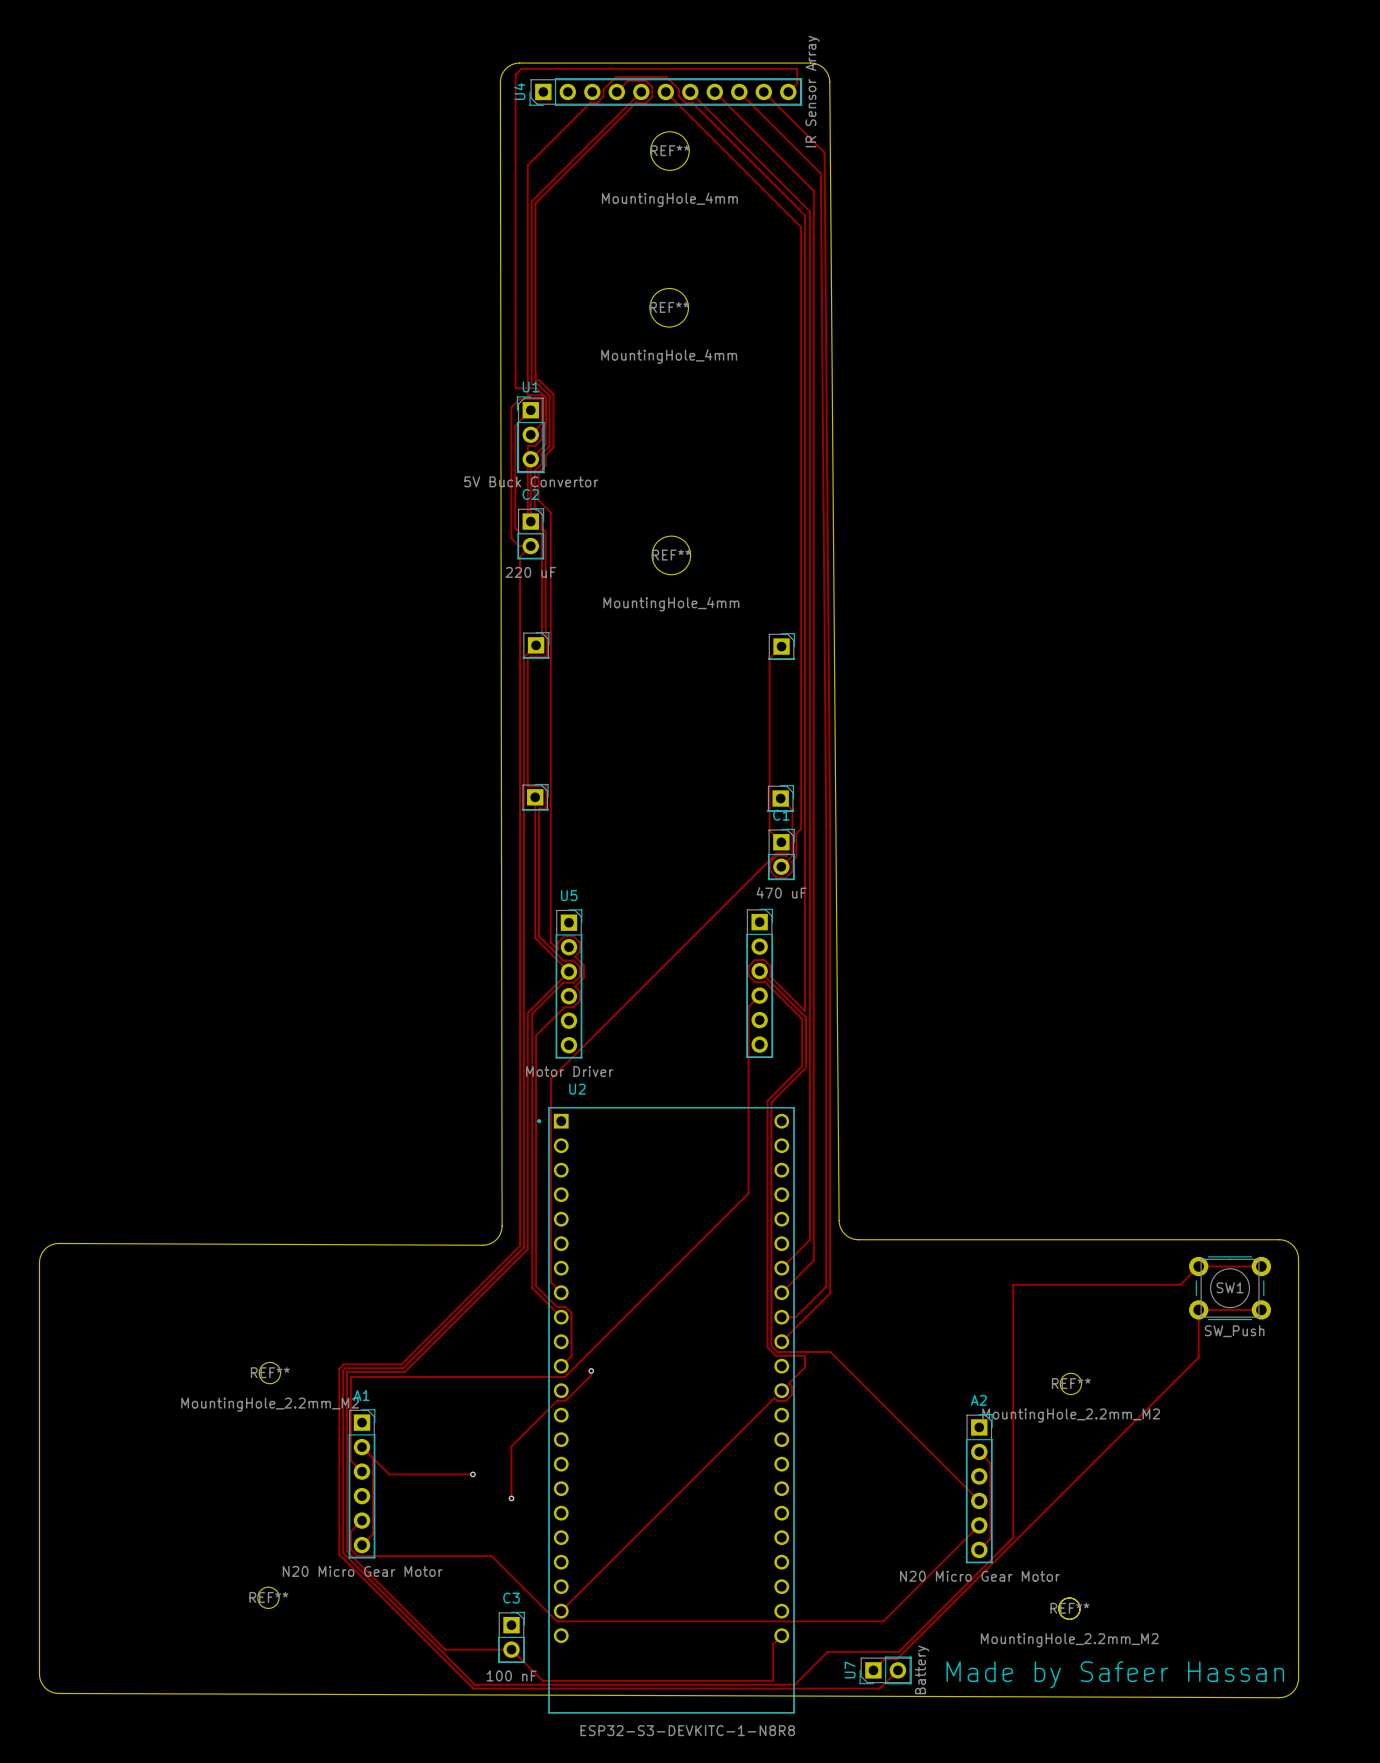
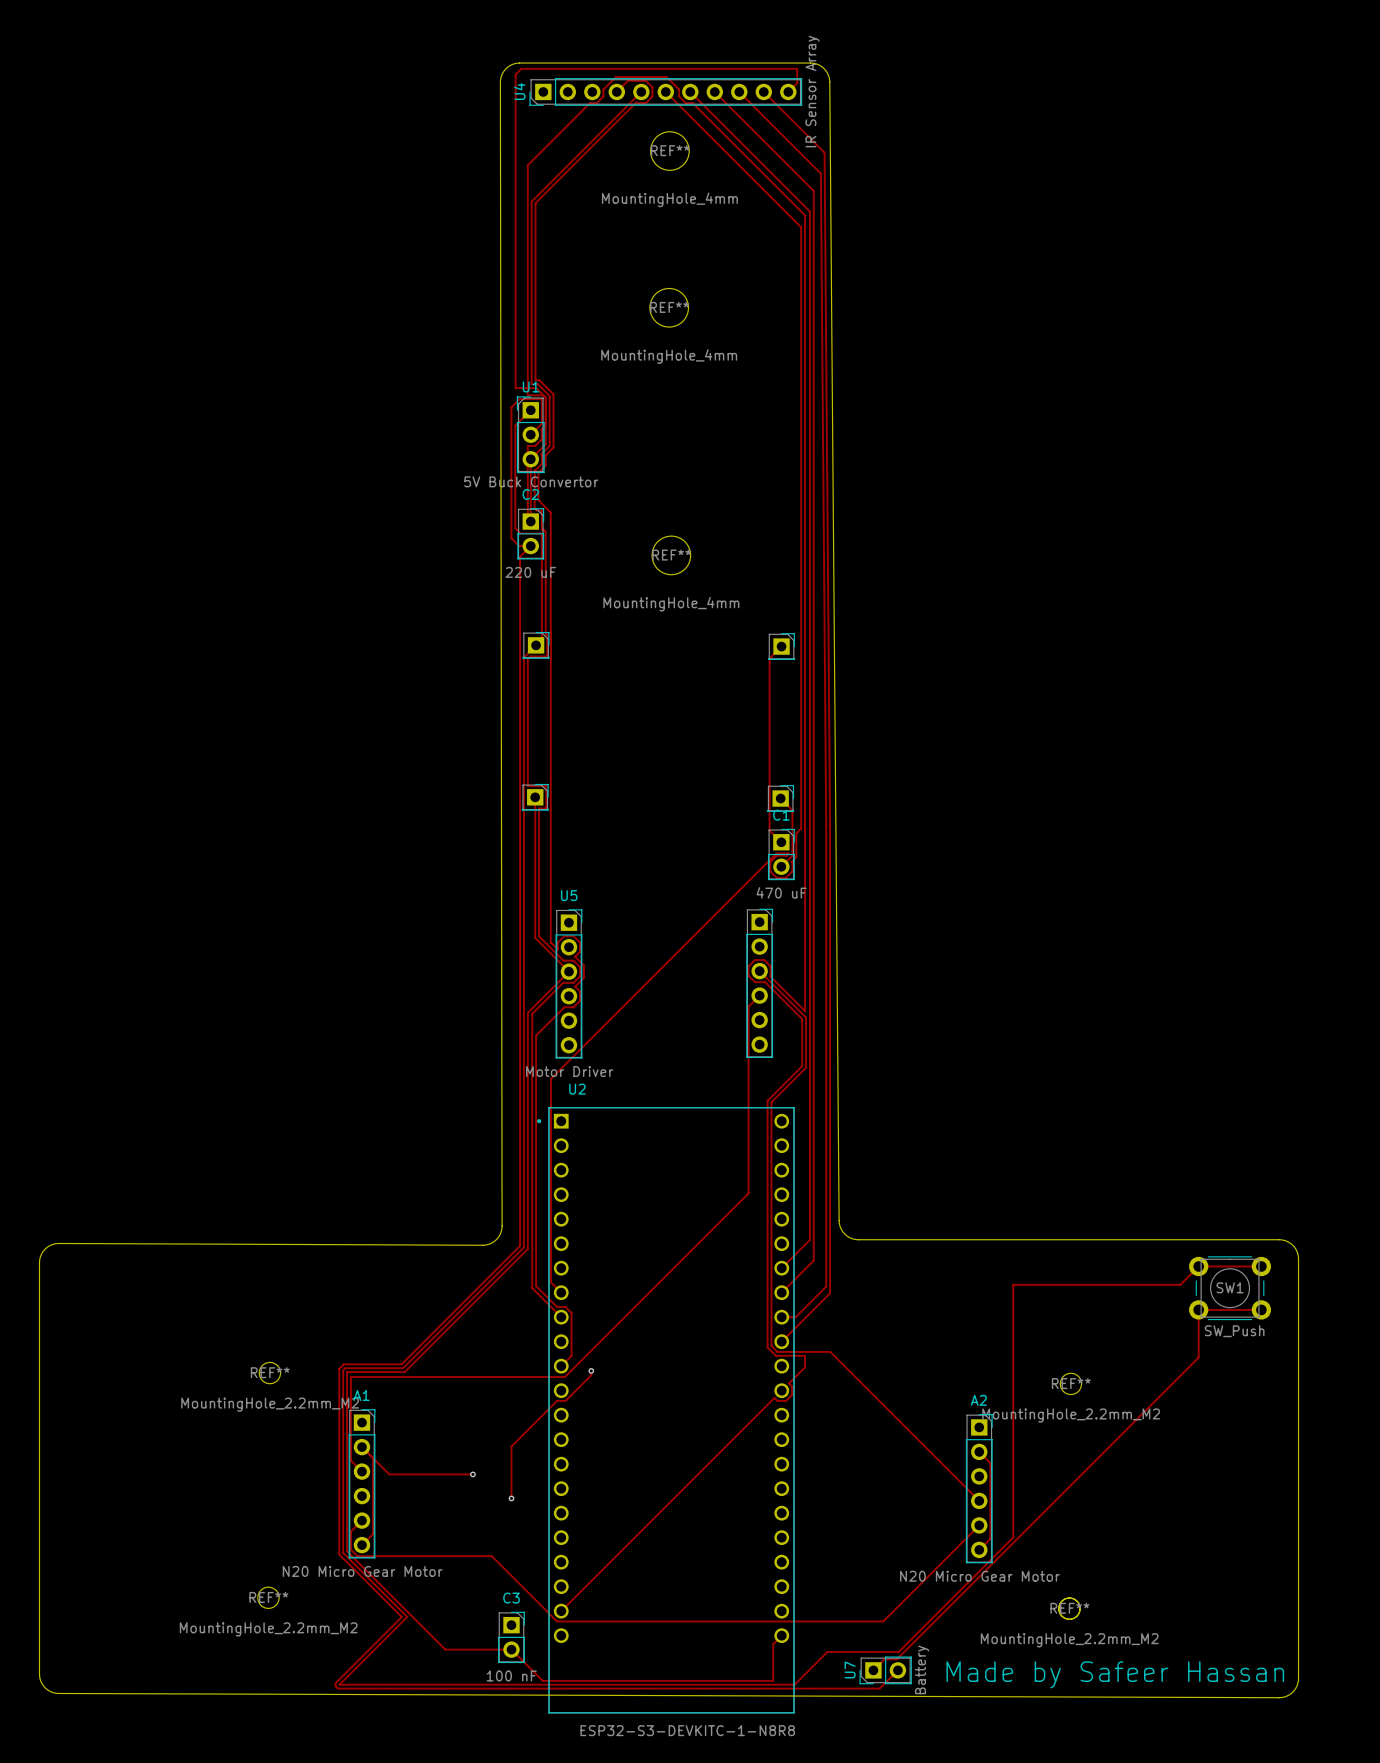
track: (401, 1616) (473, 1688) -> (401, 1616) (335, 1683) (335, 1686) (337, 1688) (473, 1688)
track: (407, 1616) (475, 1684) -> (407, 1616) (339, 1684) (475, 1684)
REF** value: none -> MountingHole_2.2mm_M2 (268, 1629)

